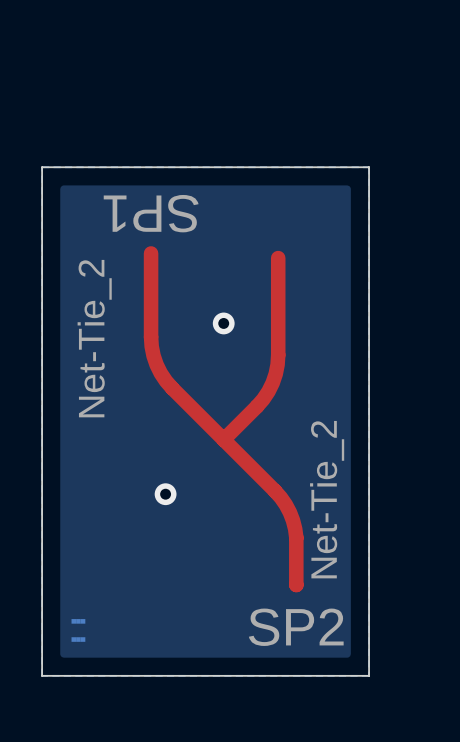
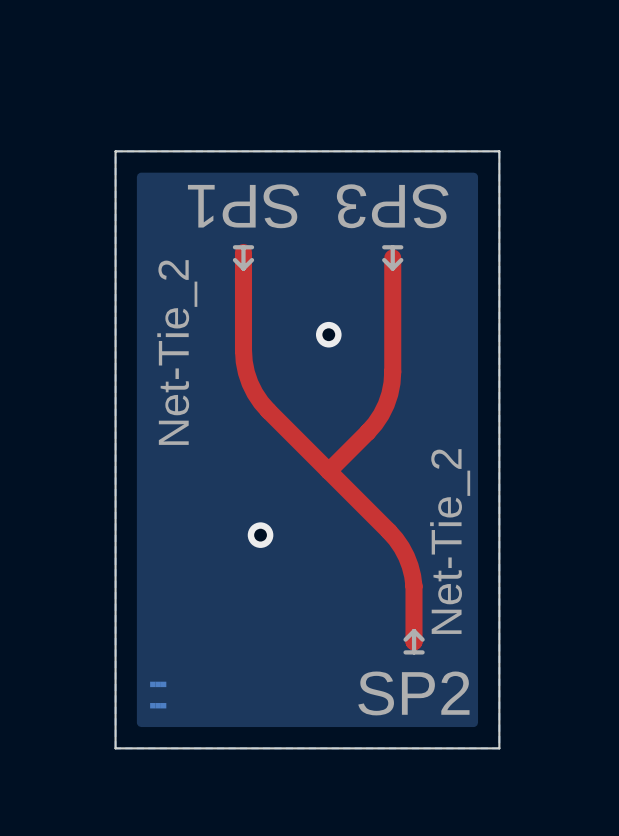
SP1 footprint: [103, 194, 199, 233] -> [232, 245, 255, 271]
SP3: none -> (392, 257)
SP2 footprint: [248, 608, 344, 646] -> [403, 628, 425, 655]

